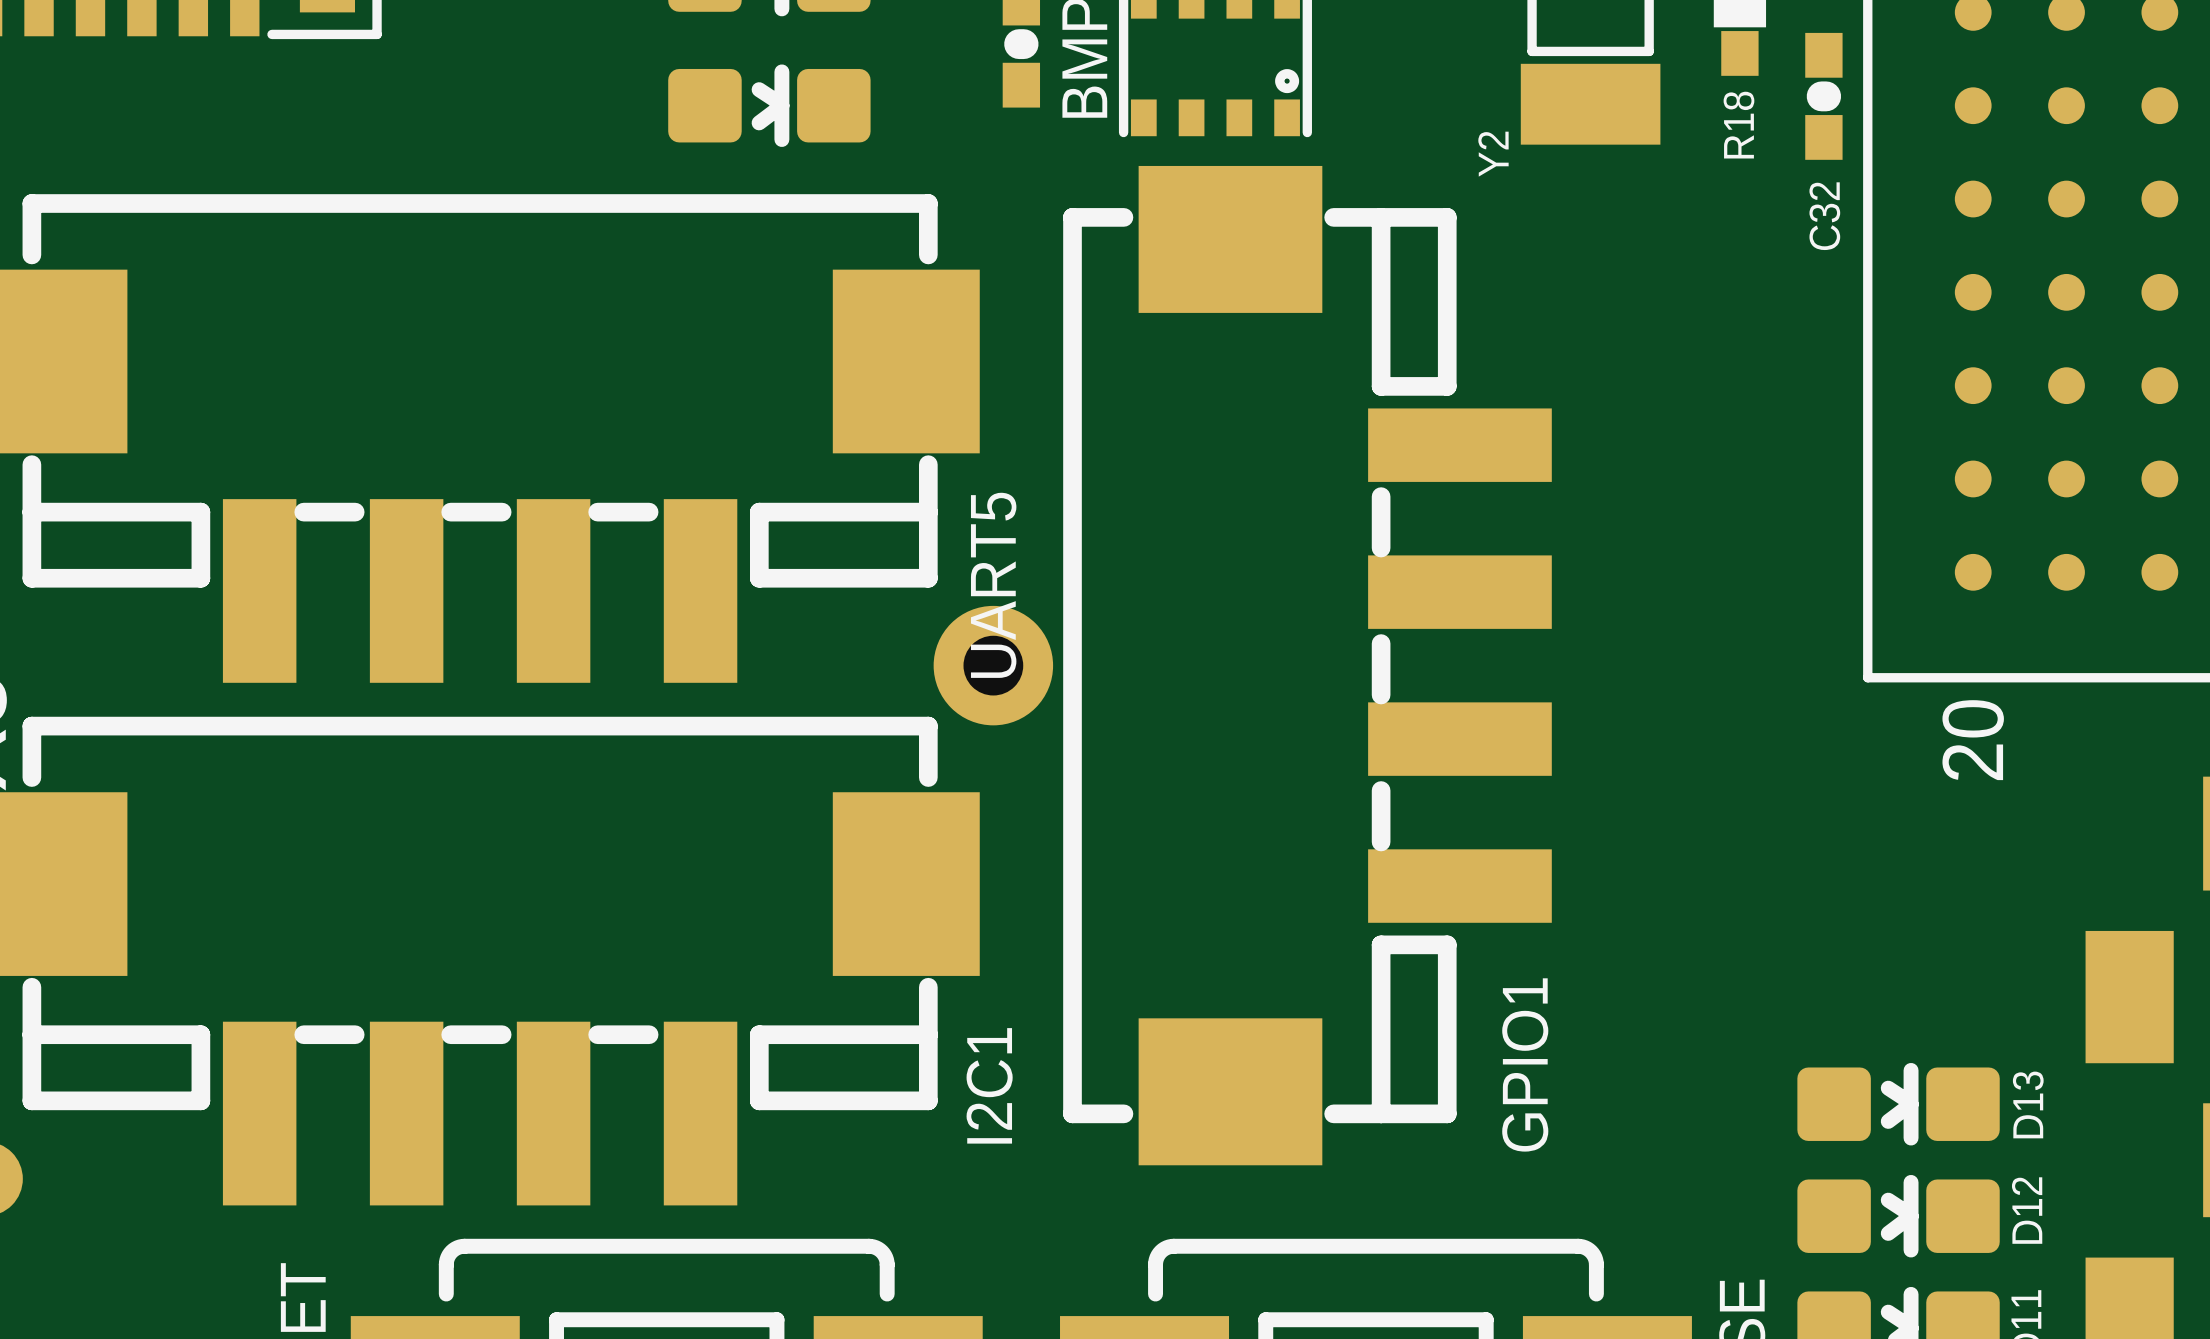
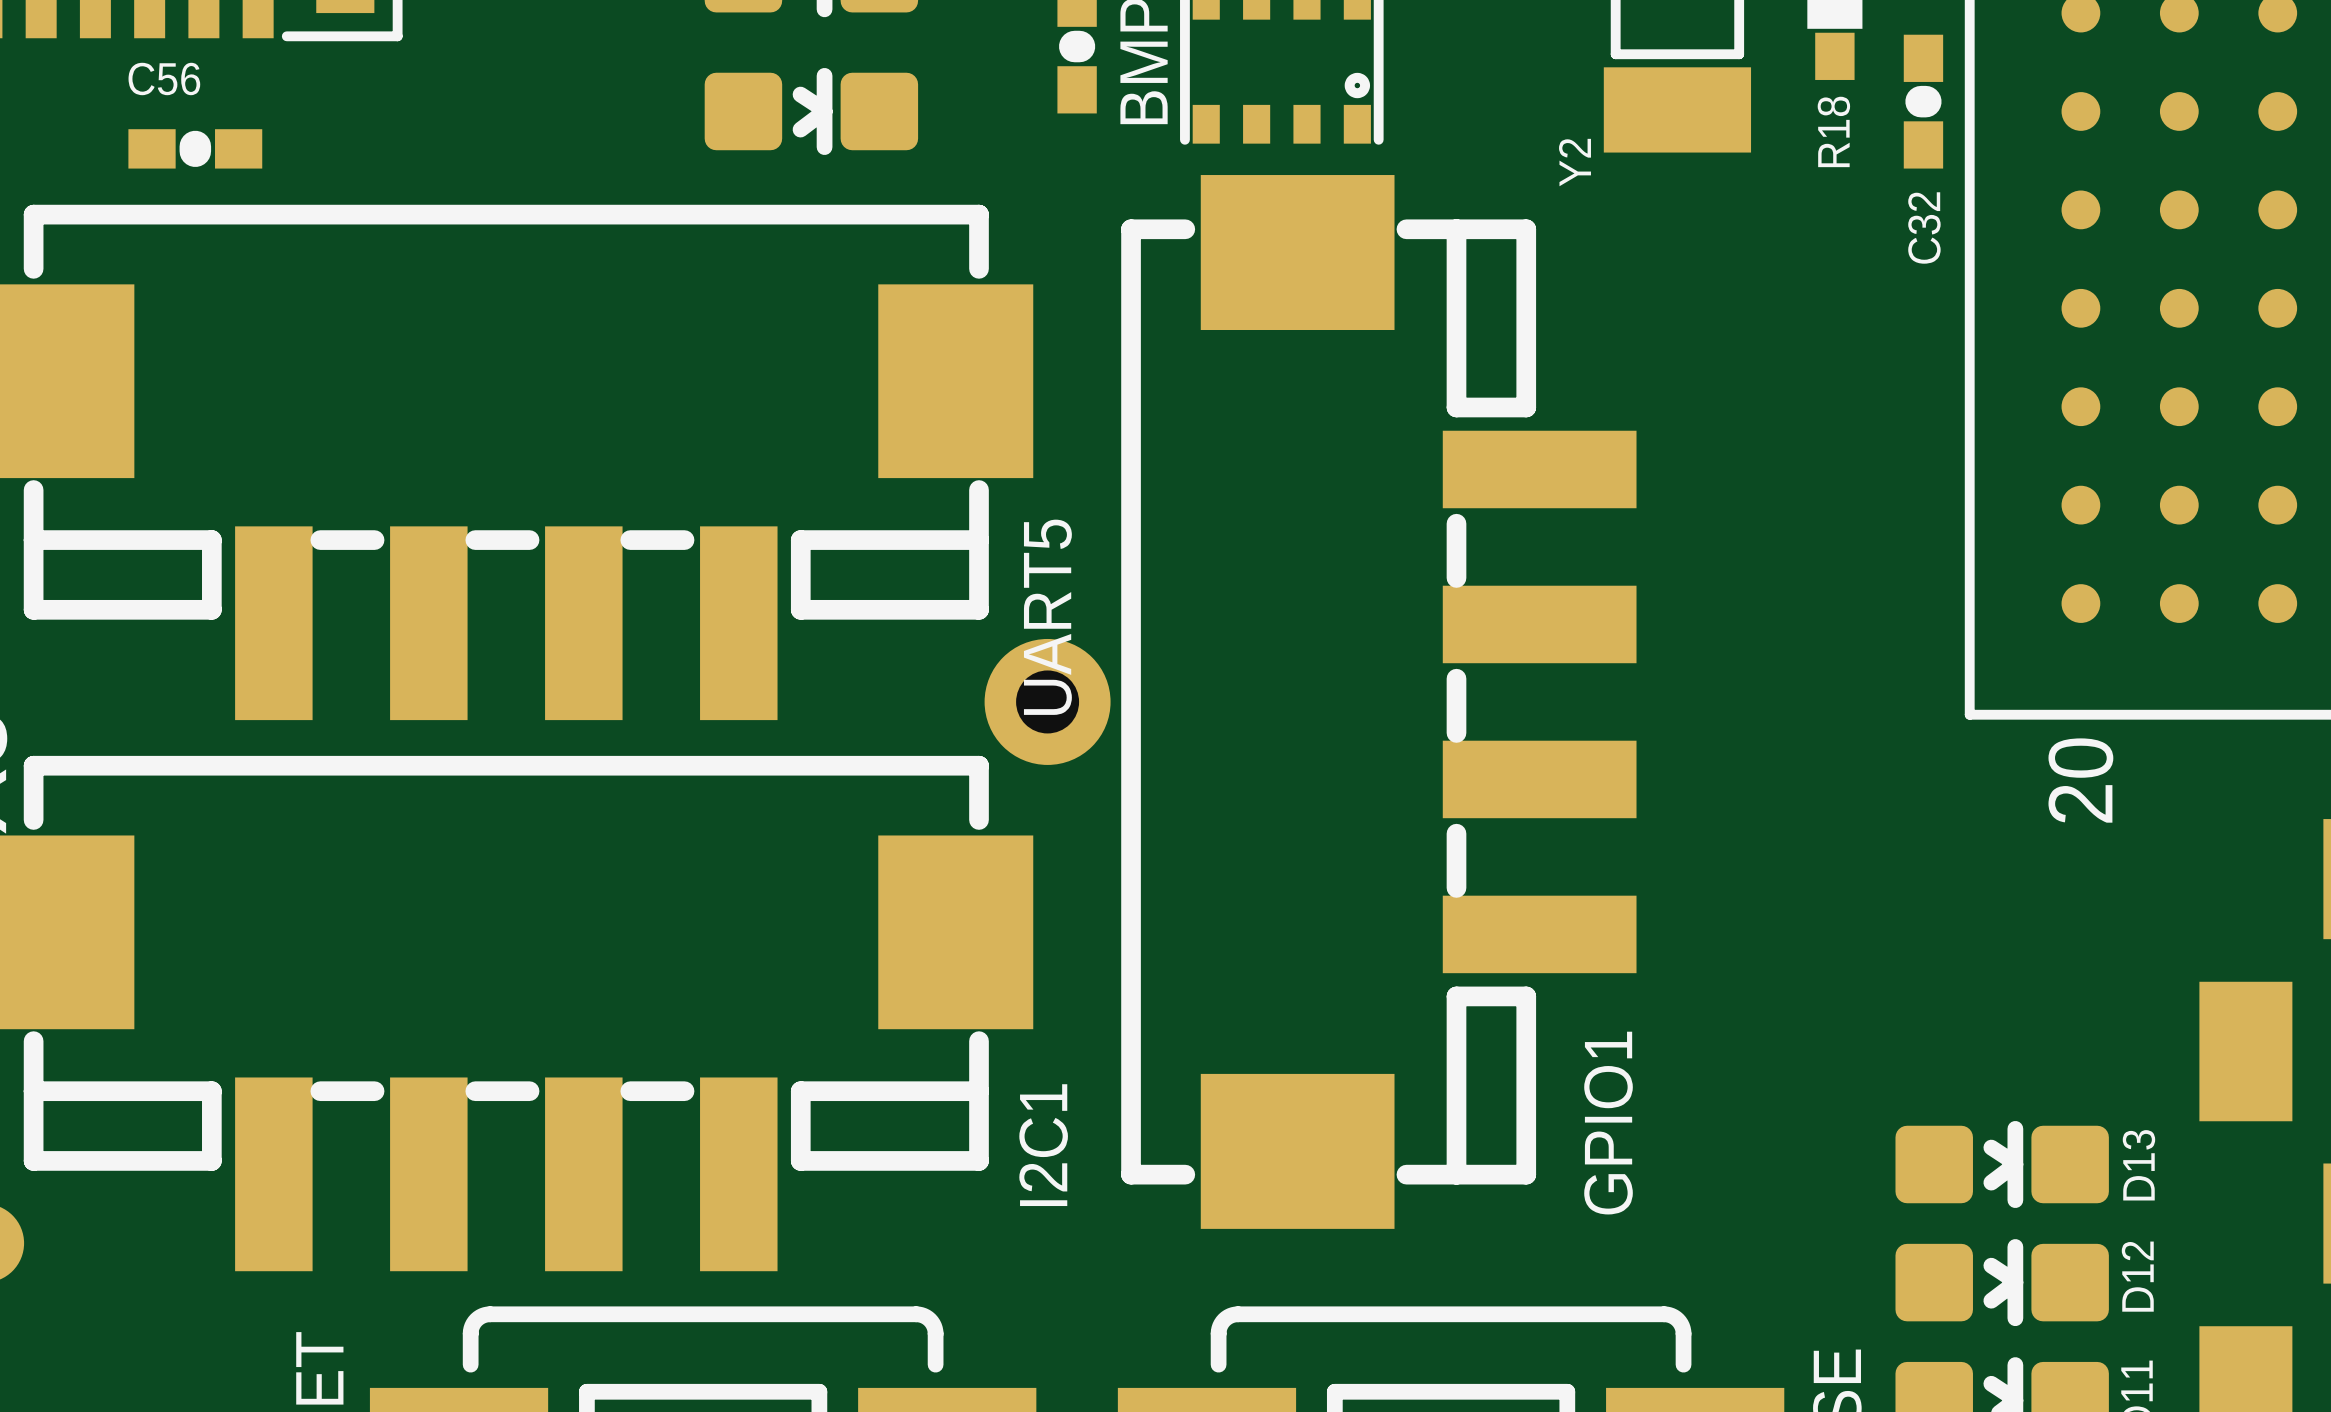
C56: none -> (195, 148)

